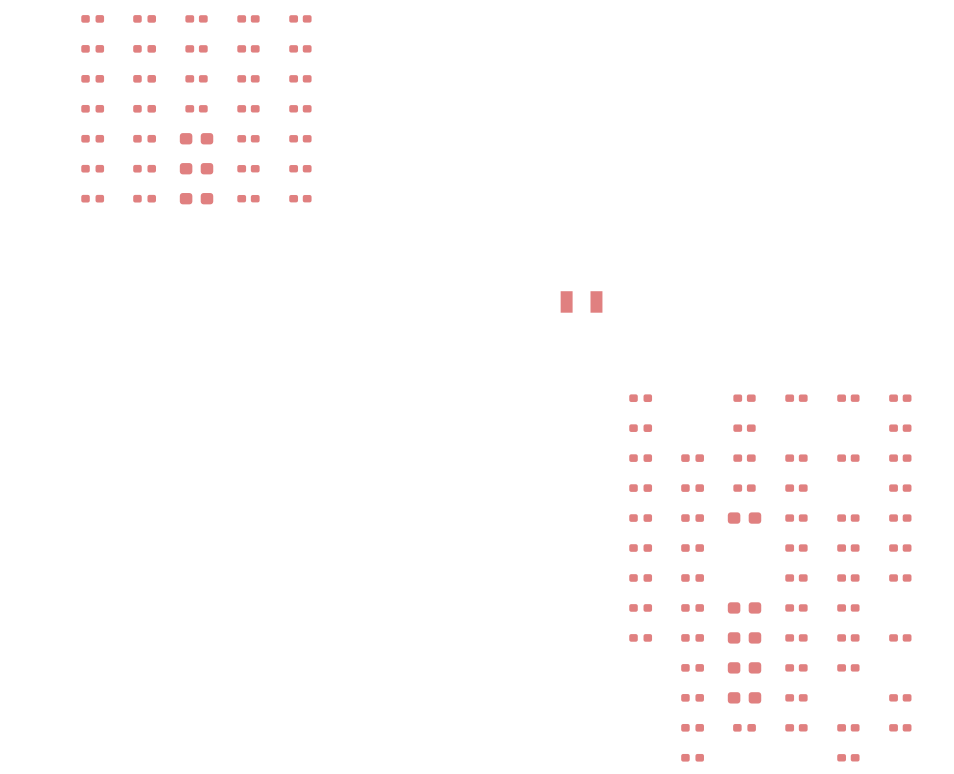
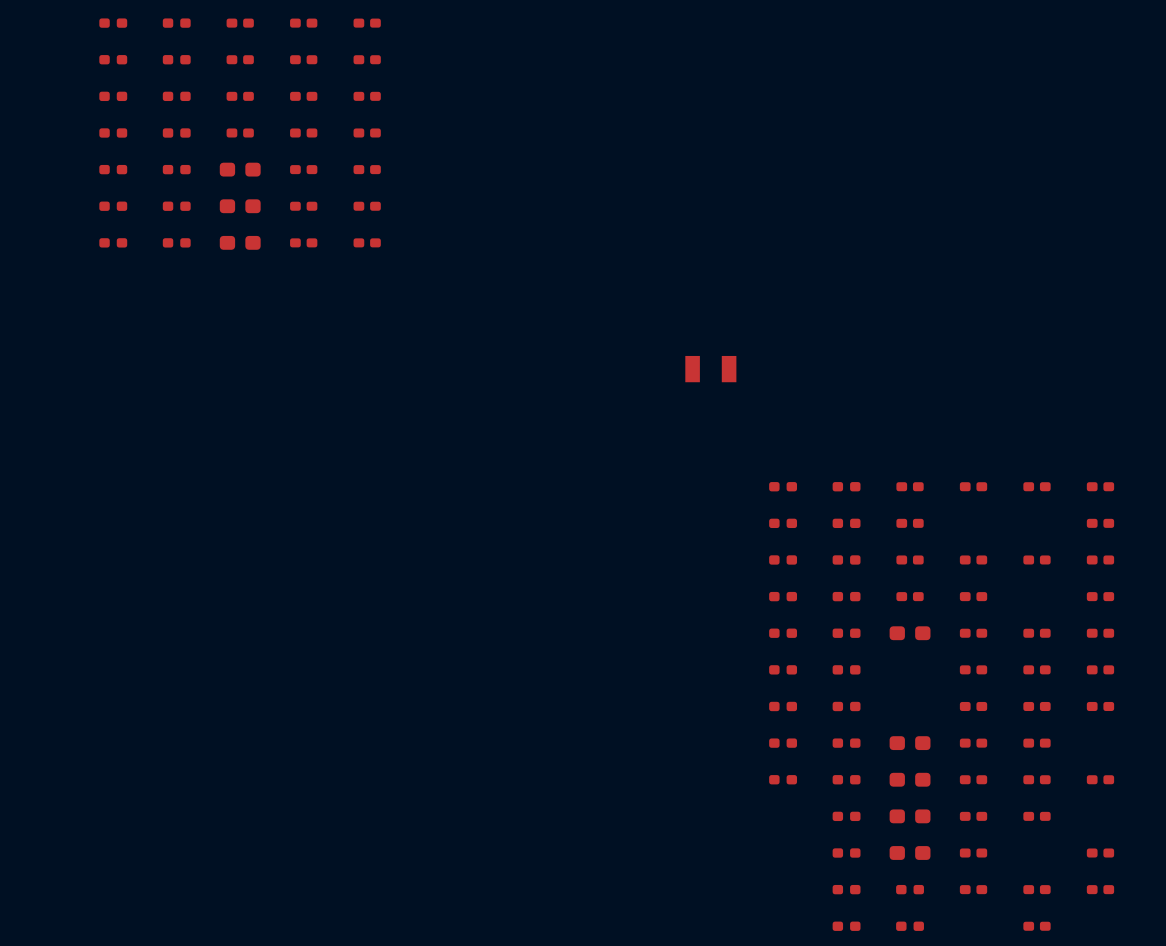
part: none -> (846, 486)
part: none -> (846, 523)
part: none -> (910, 926)

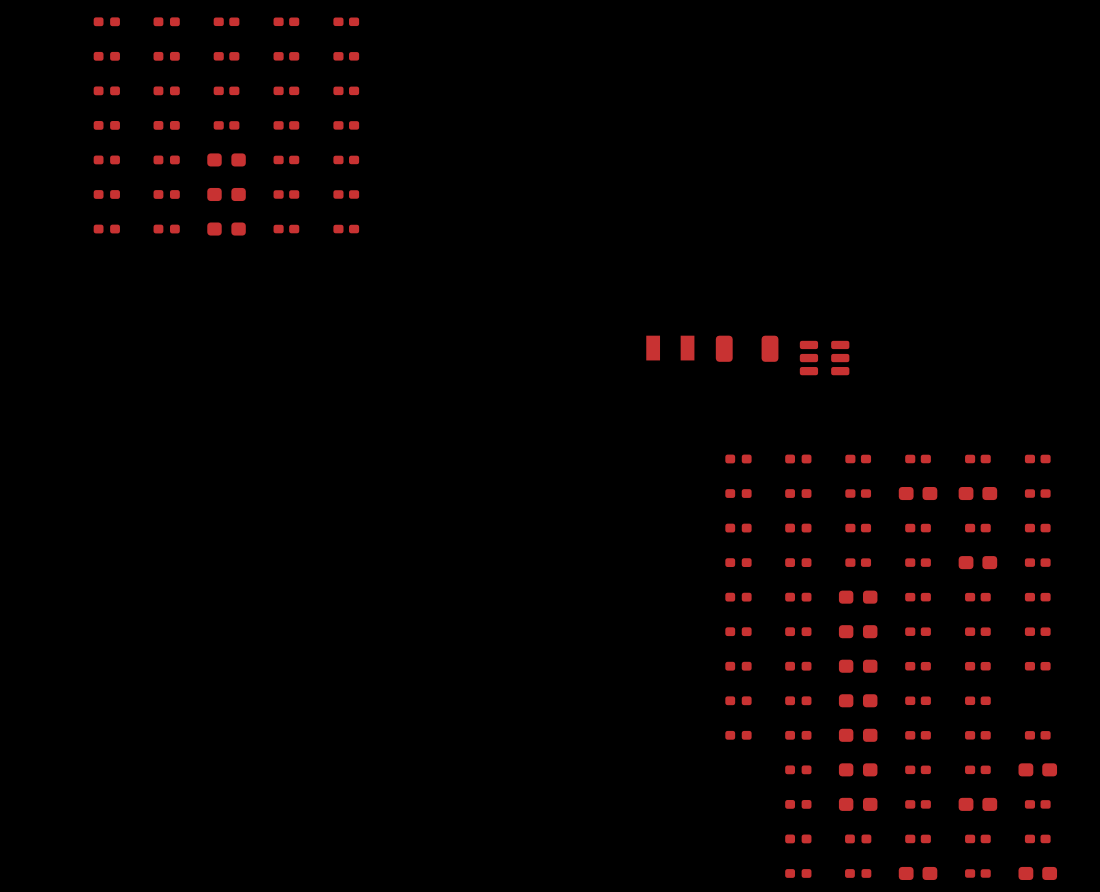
part: none -> (747, 348)
part: none -> (824, 358)
part: none -> (918, 493)
part: none -> (977, 493)
part: none -> (977, 562)
part: none -> (858, 631)
part: none -> (858, 666)
part: none -> (1037, 769)
part: none -> (977, 804)
part: none -> (918, 873)
part: none -> (1037, 873)

